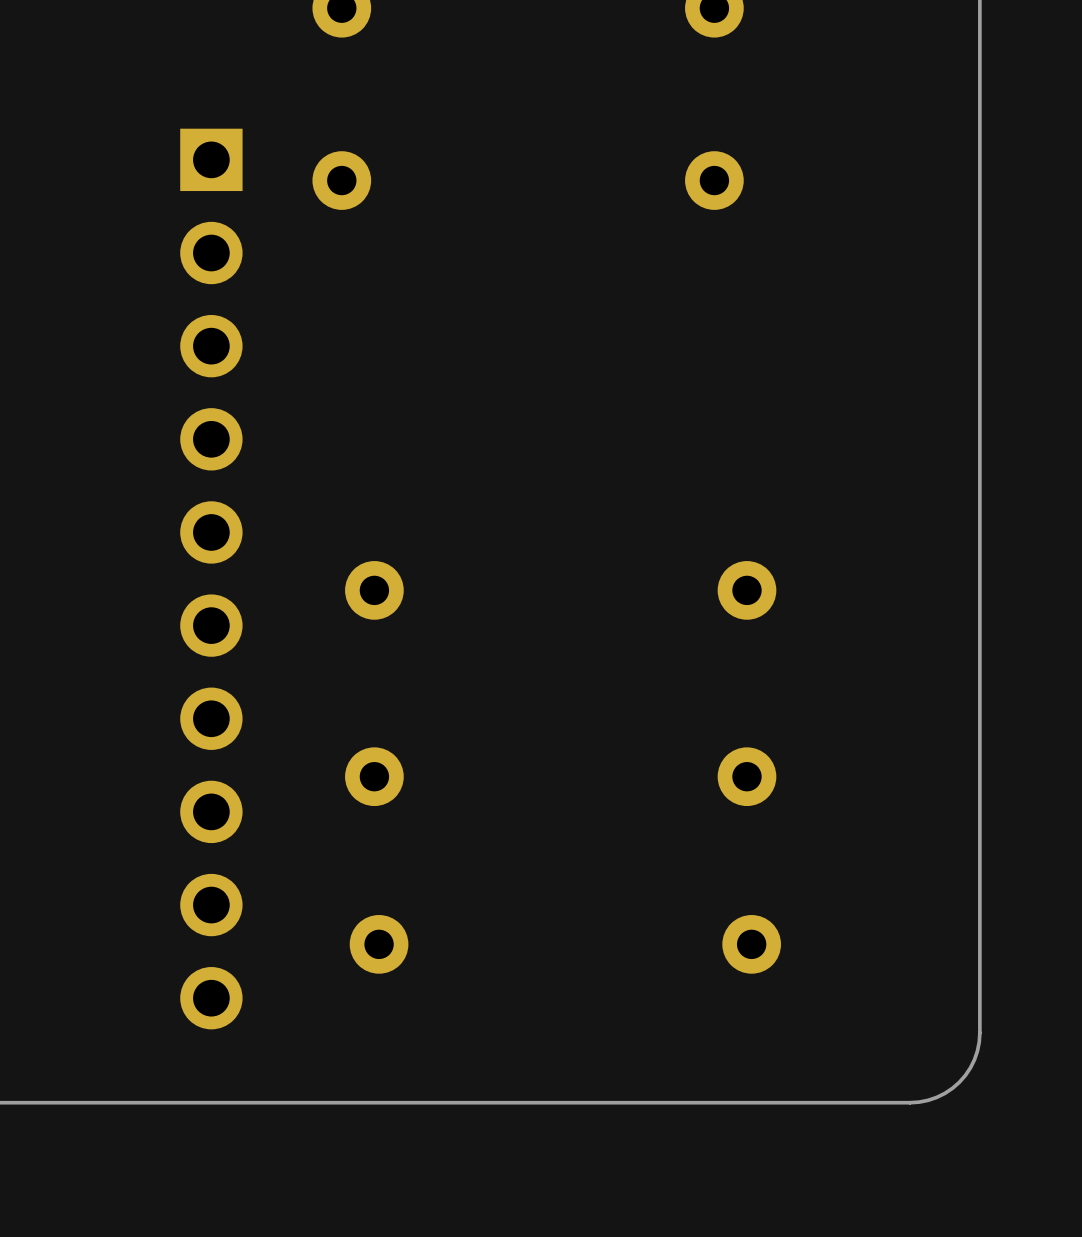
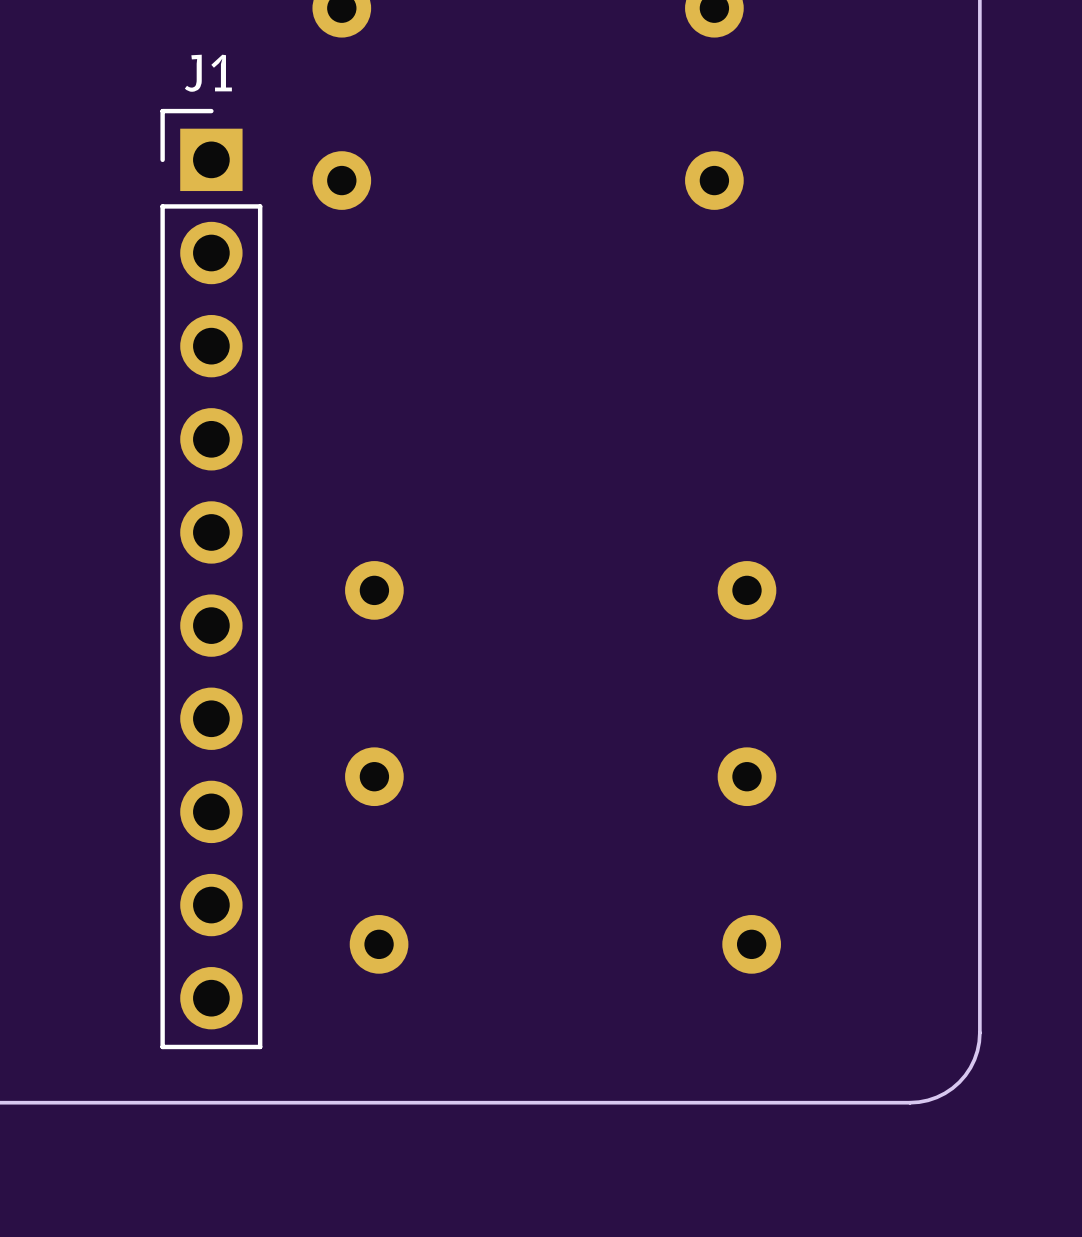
J1 side: top (211, 579) -> bottom (211, 579)

